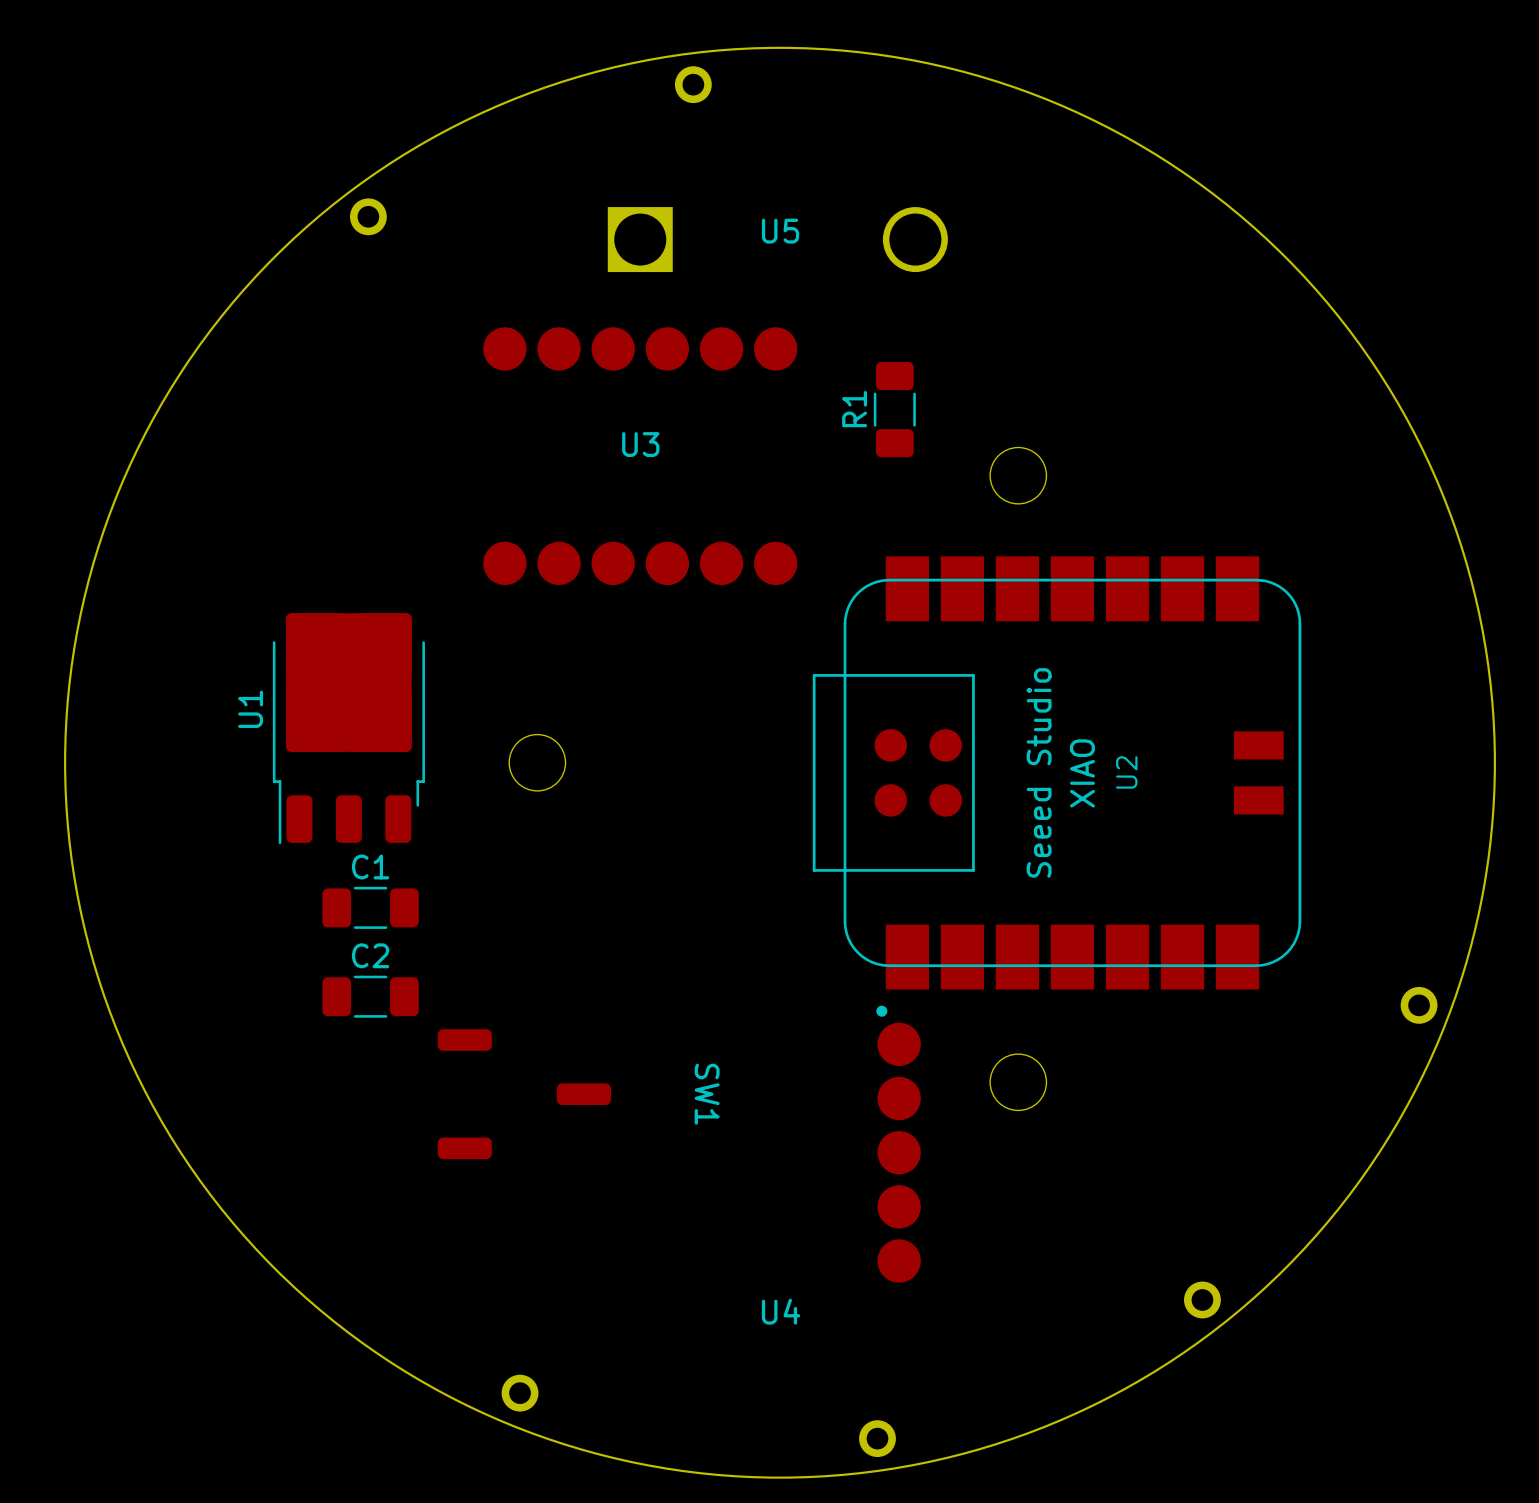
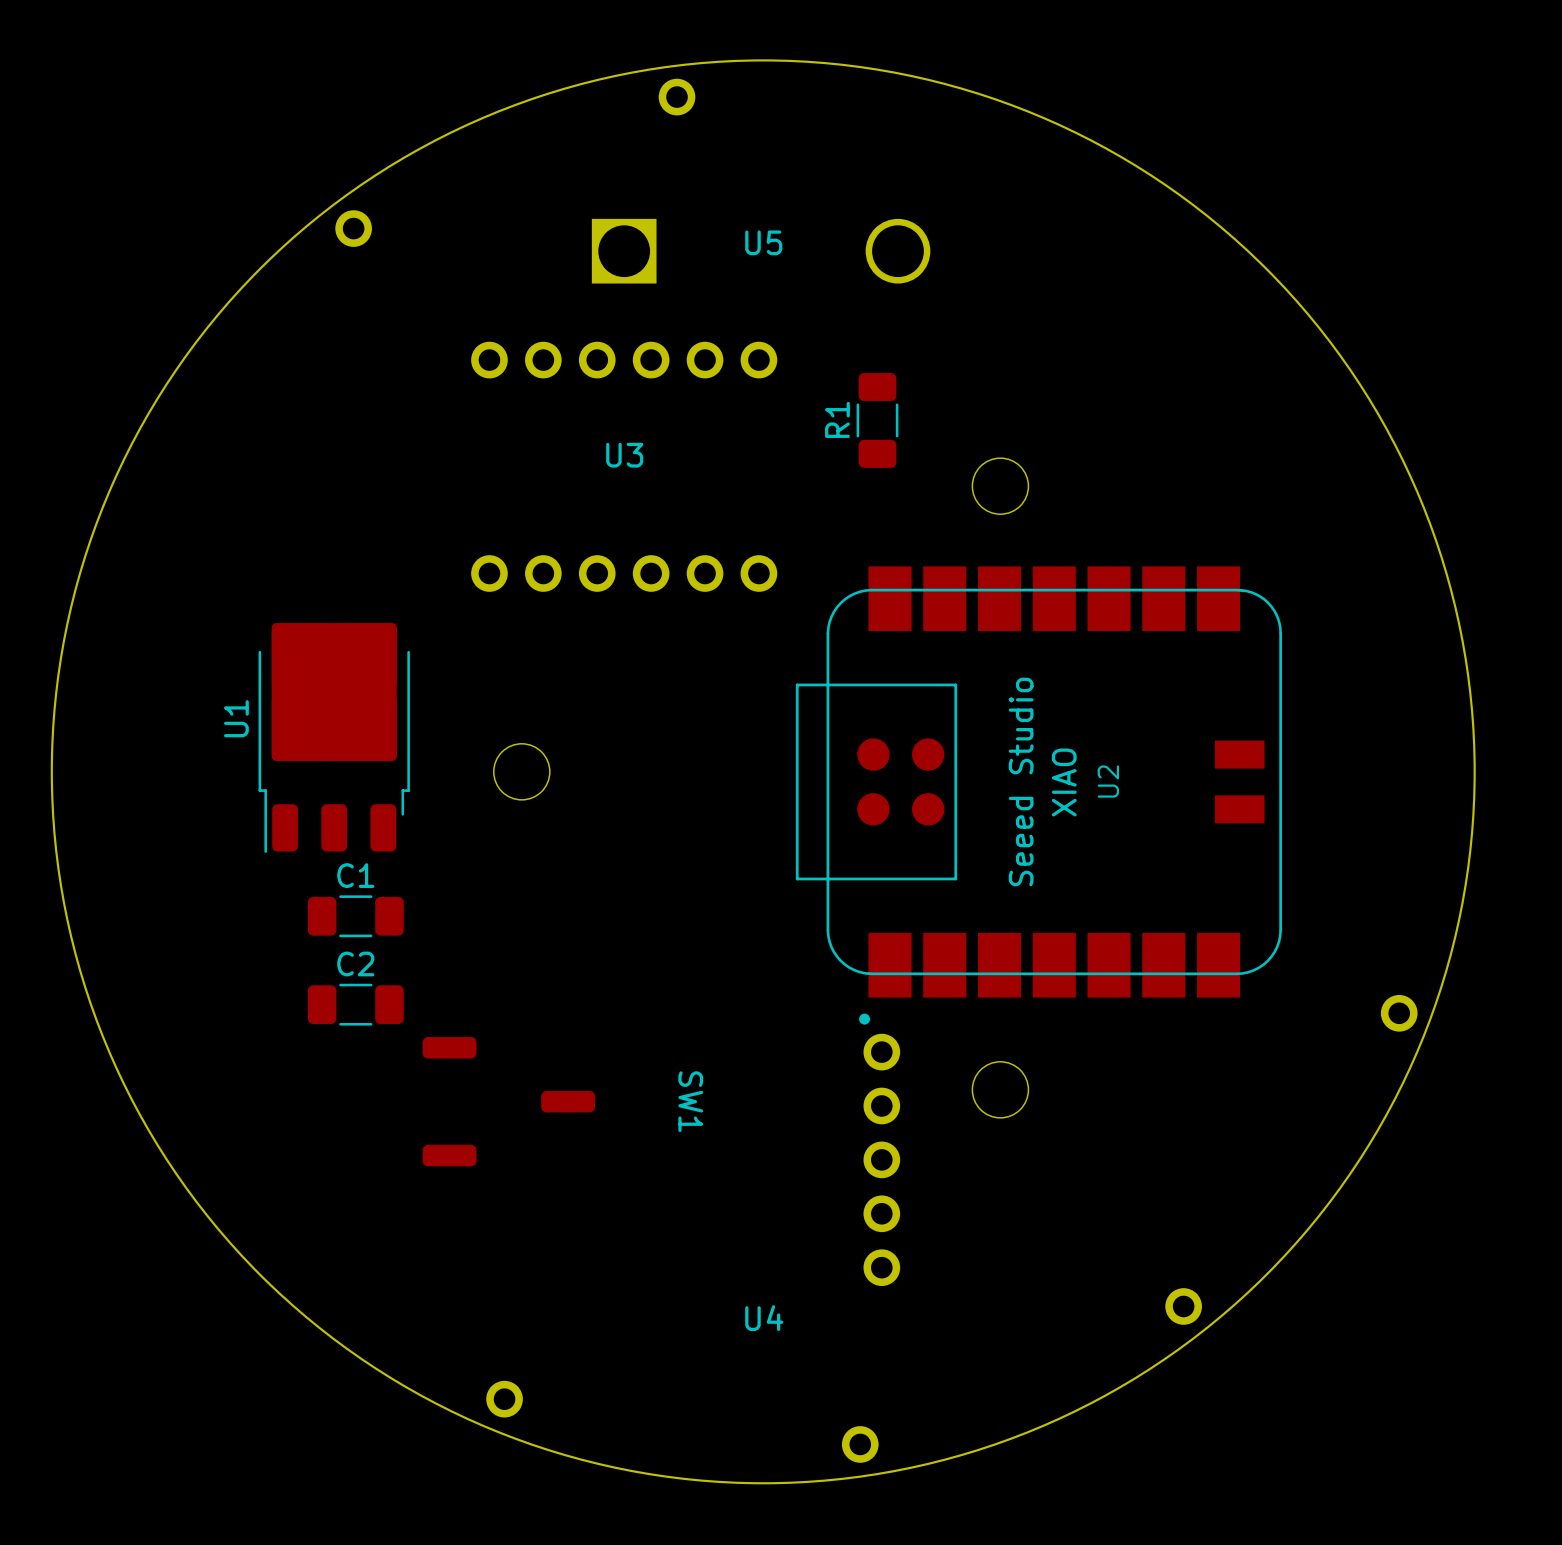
U3 footprint: [483, 327, 798, 586] -> [471, 341, 778, 592]
U4 footprint: [877, 1022, 921, 1283] -> [863, 1033, 901, 1287]

